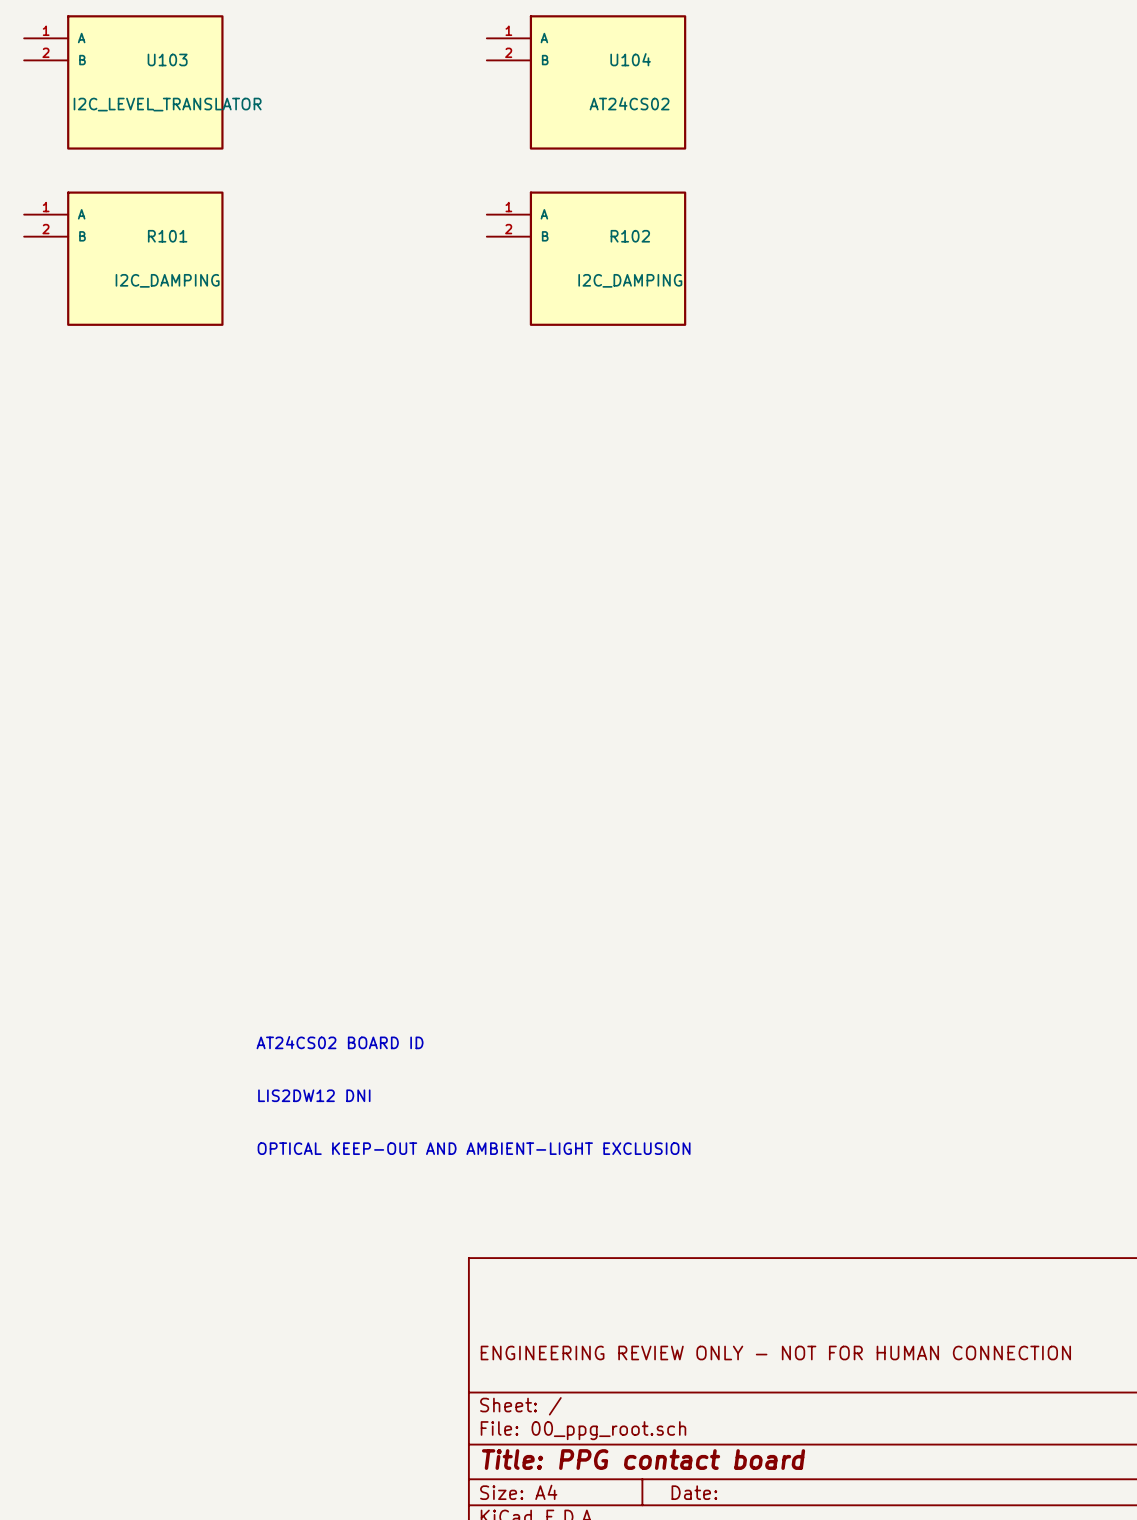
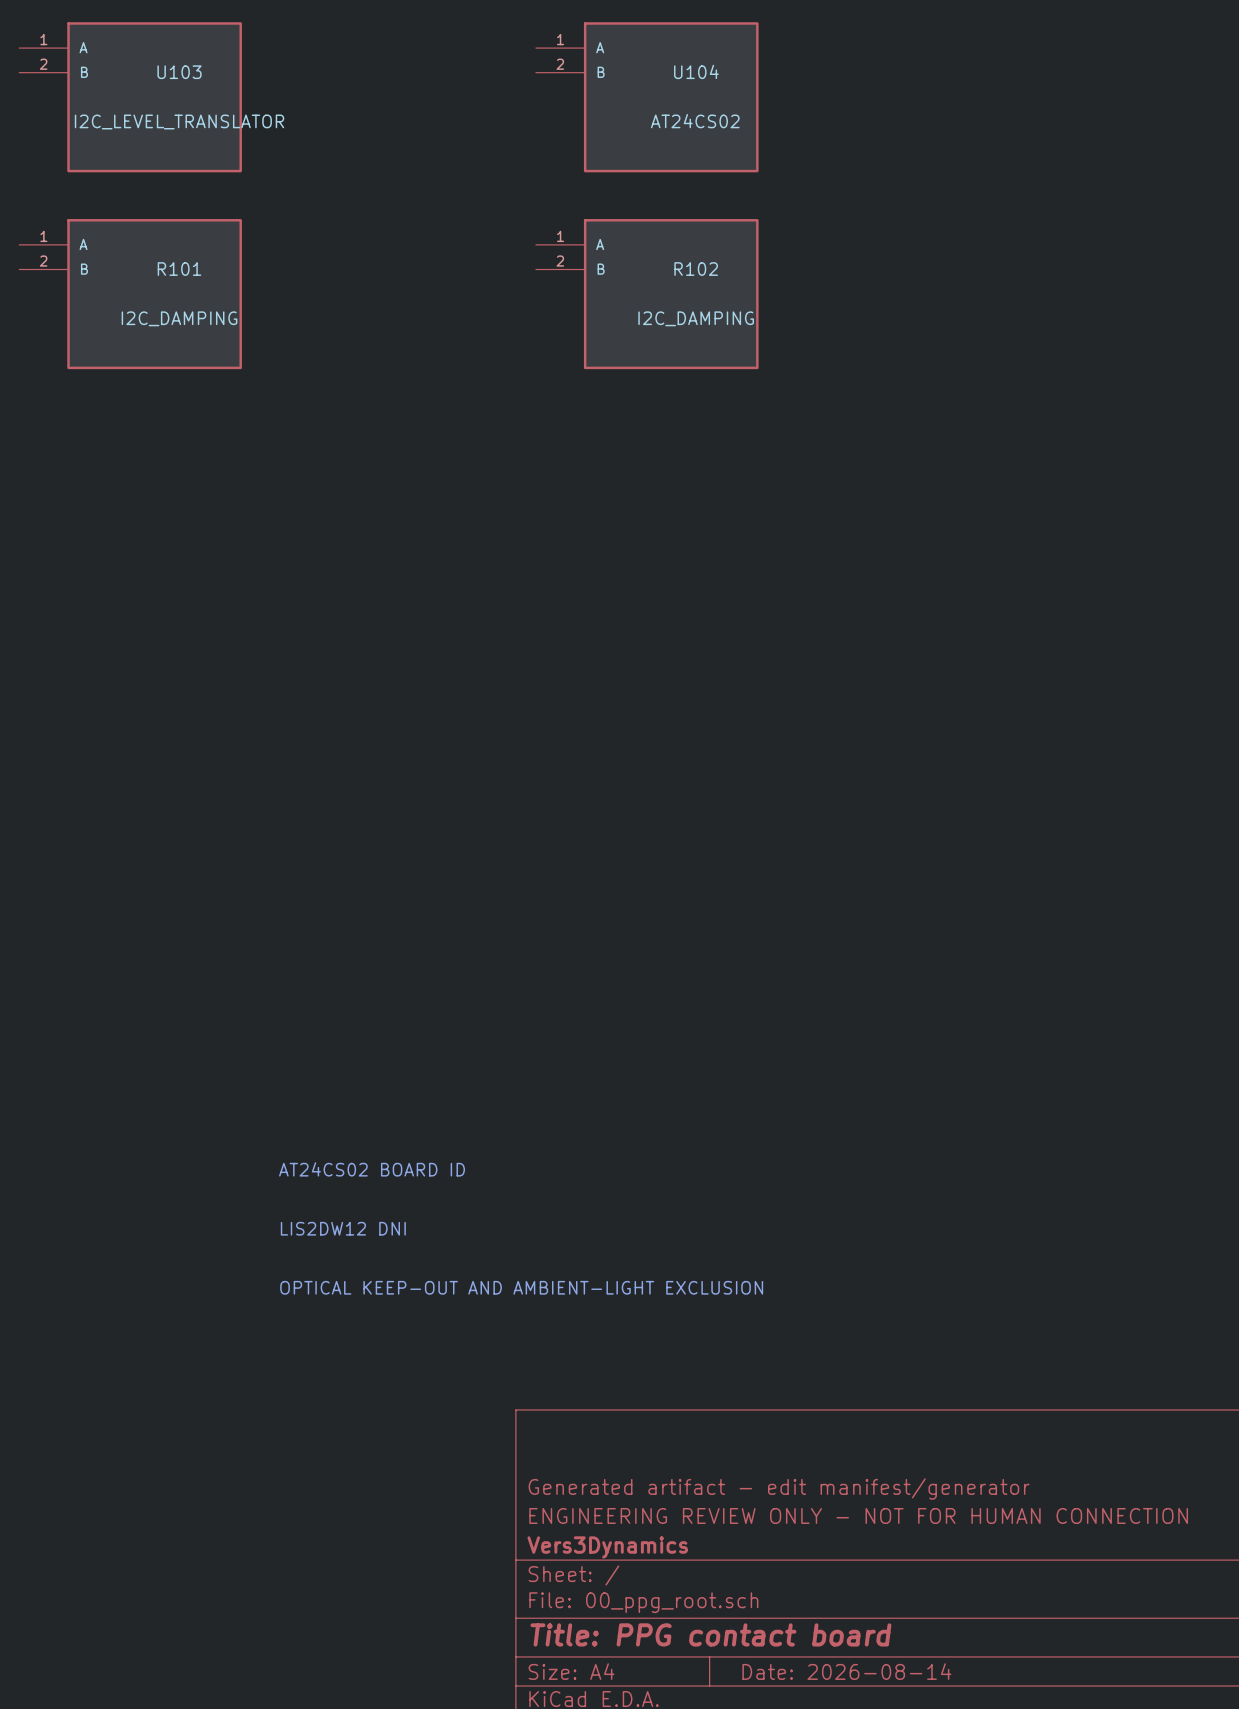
title block: none -> Generated artifact - edit manifest/generator (779, 1488)
title block: none -> Vers3Dynamics (607, 1547)
title block: Date: (694, 1492) -> Date: 2026-08-14 (846, 1671)

